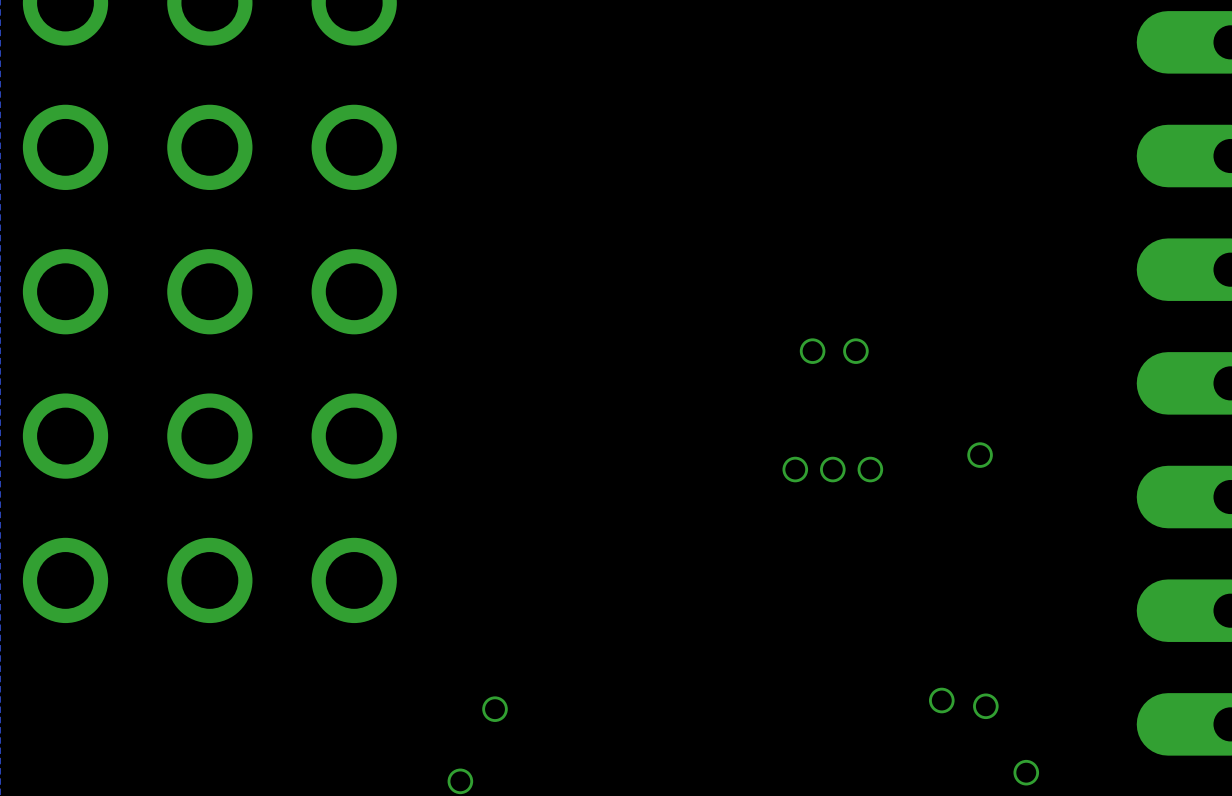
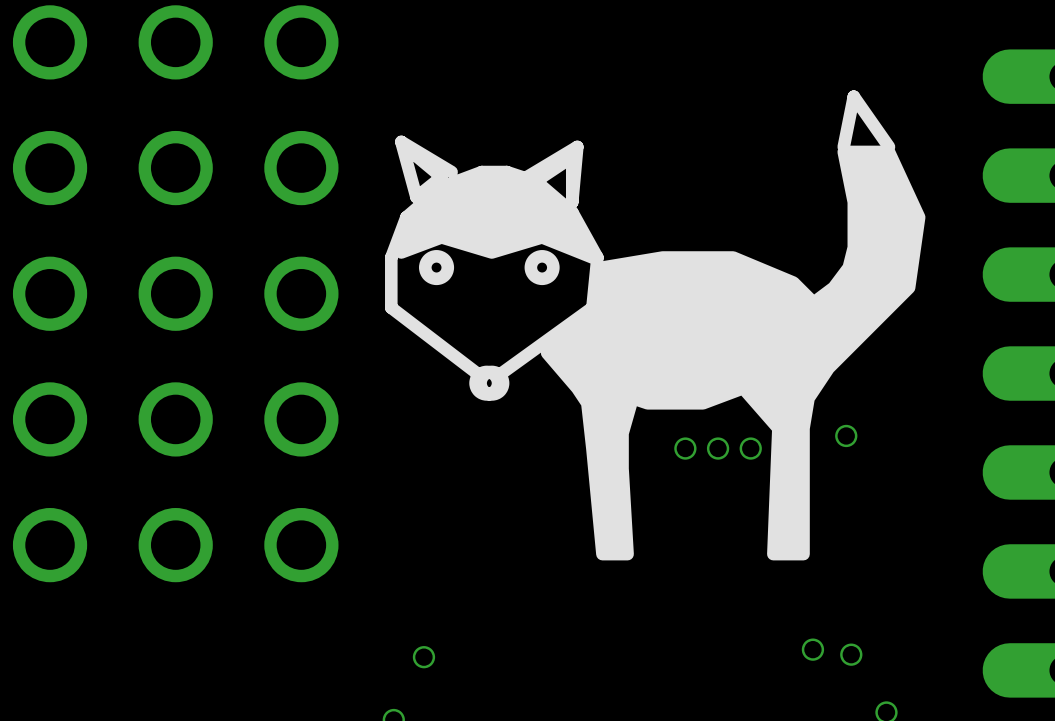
drawing: none -> [395, 145, 926, 561]
line: none -> (888, 146) (853, 96) (843, 146)
line: none -> (411, 151) (441, 177) (416, 197) (401, 141) (451, 172)
line: none -> (542, 177) (572, 156) (572, 202) (577, 146) (527, 177)
line: none -> (501, 373) (592, 307) (597, 257) (572, 212) (537, 182) (506, 172) (481, 172) (441, 187) (406, 217) (391, 257) (391, 307) (476, 373)

